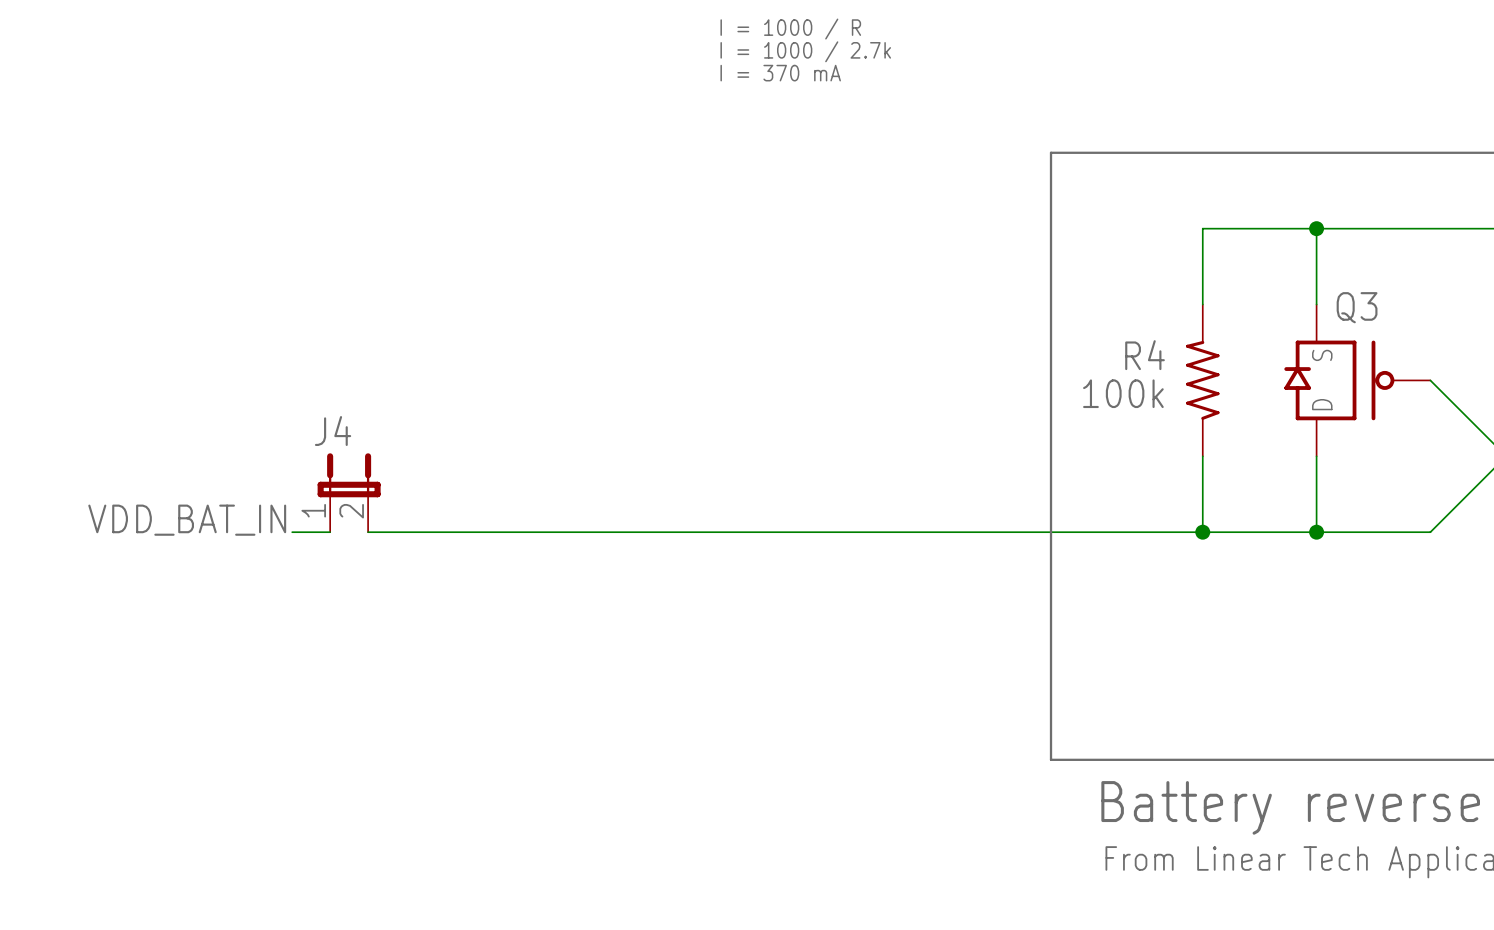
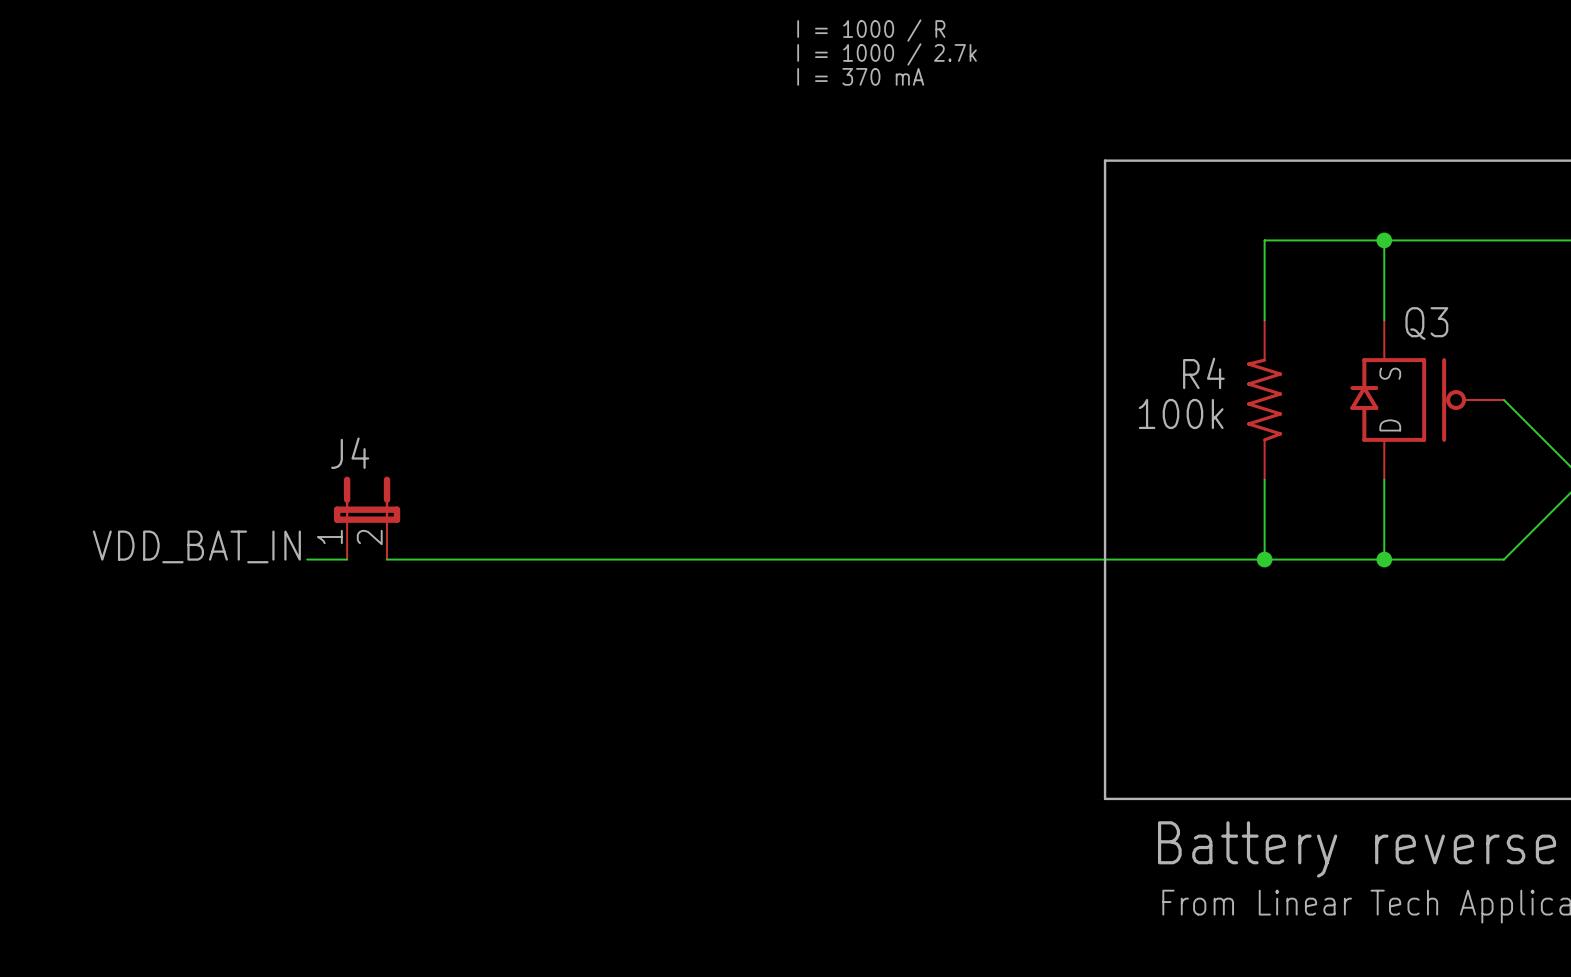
text position: I = 1000 / R (790, 29) -> I = 1000 / R (871, 30)
text position: I = 1000 / 2.7k (805, 51) -> I = 1000 / 2.7k (887, 54)
text position: I = 370 mA (780, 73) -> I = 370 mA (860, 76)

